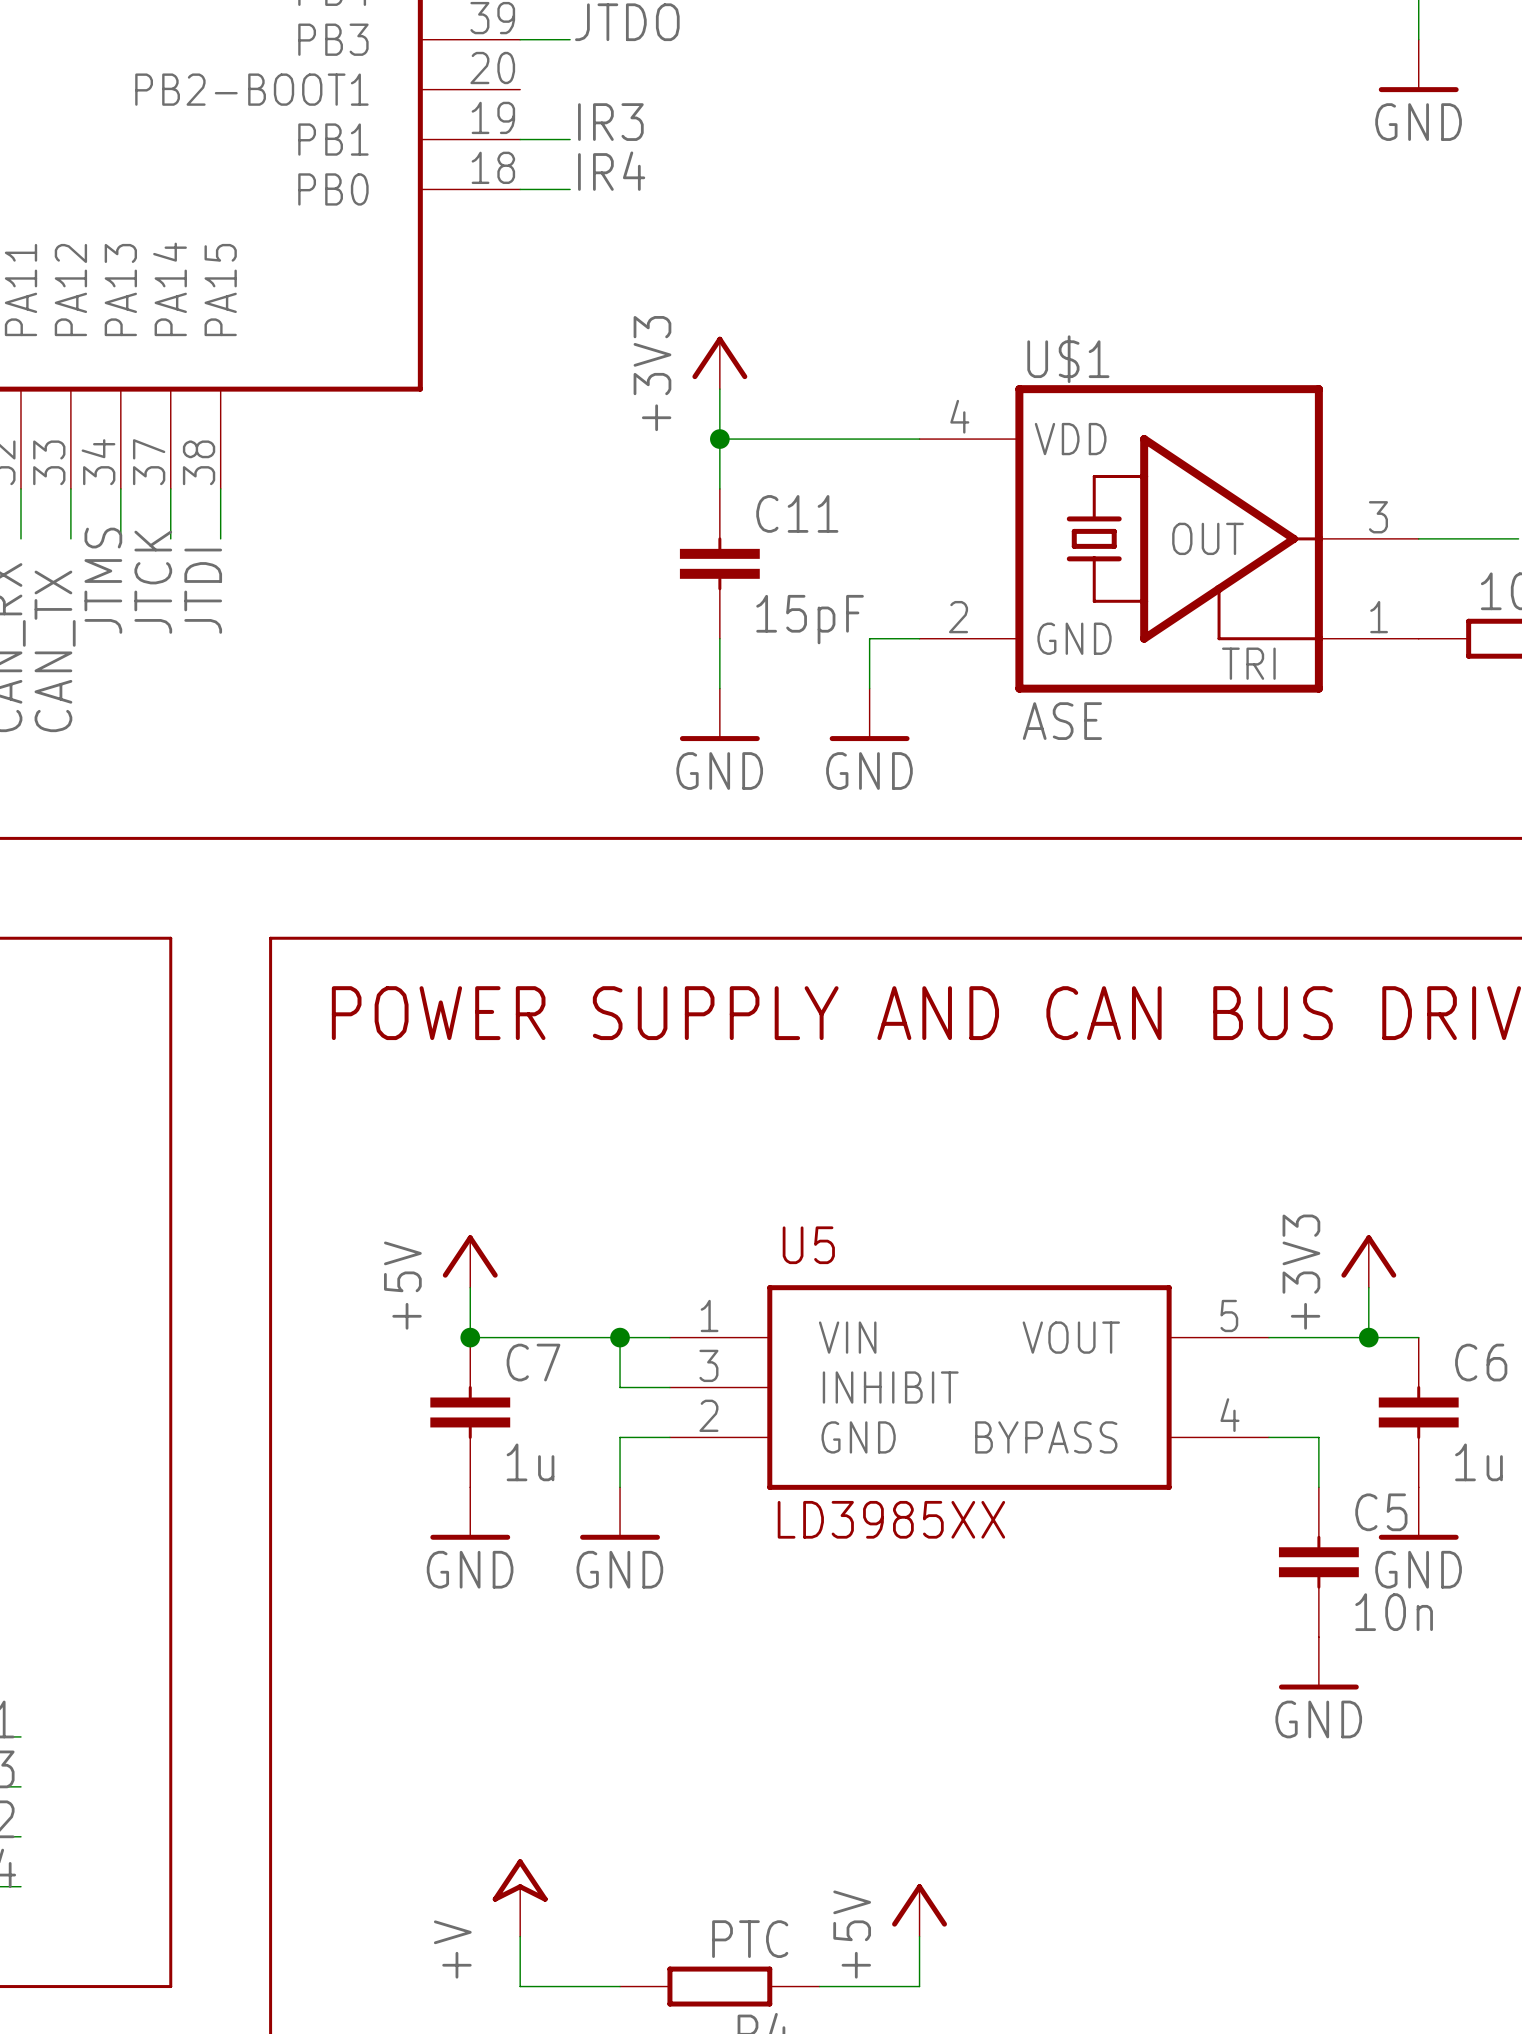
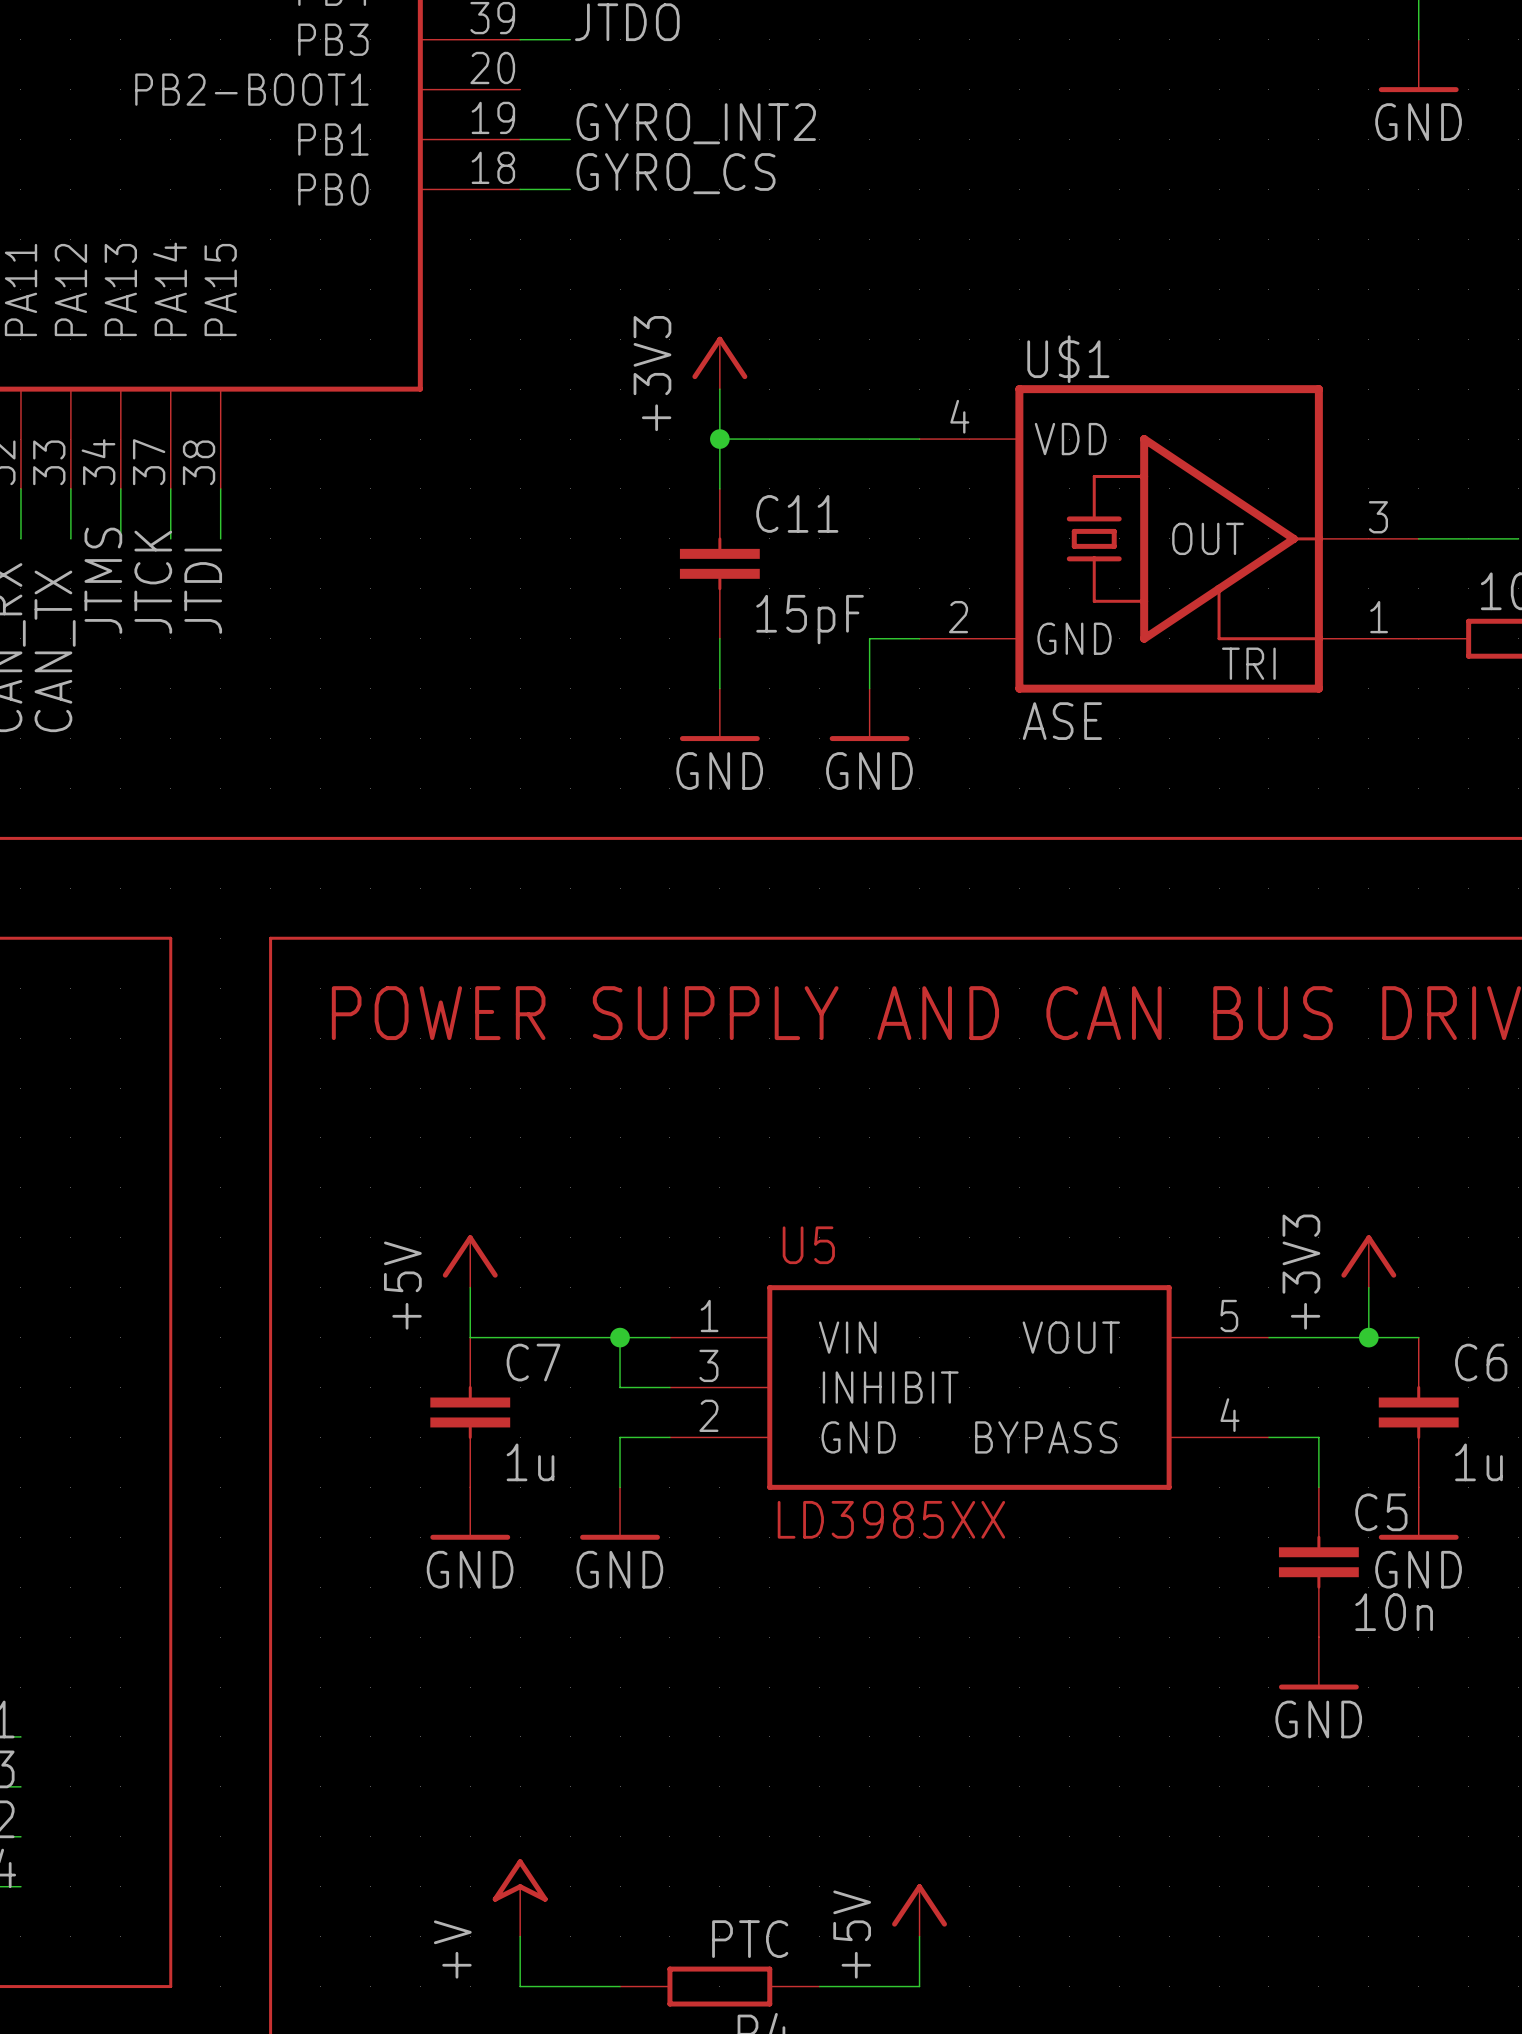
label: IR3 (610, 122) -> GYRO_INT2 (696, 123)
label: IR4 (611, 171) -> GYRO_CS (676, 173)
junction: (470, 1337) -> none

